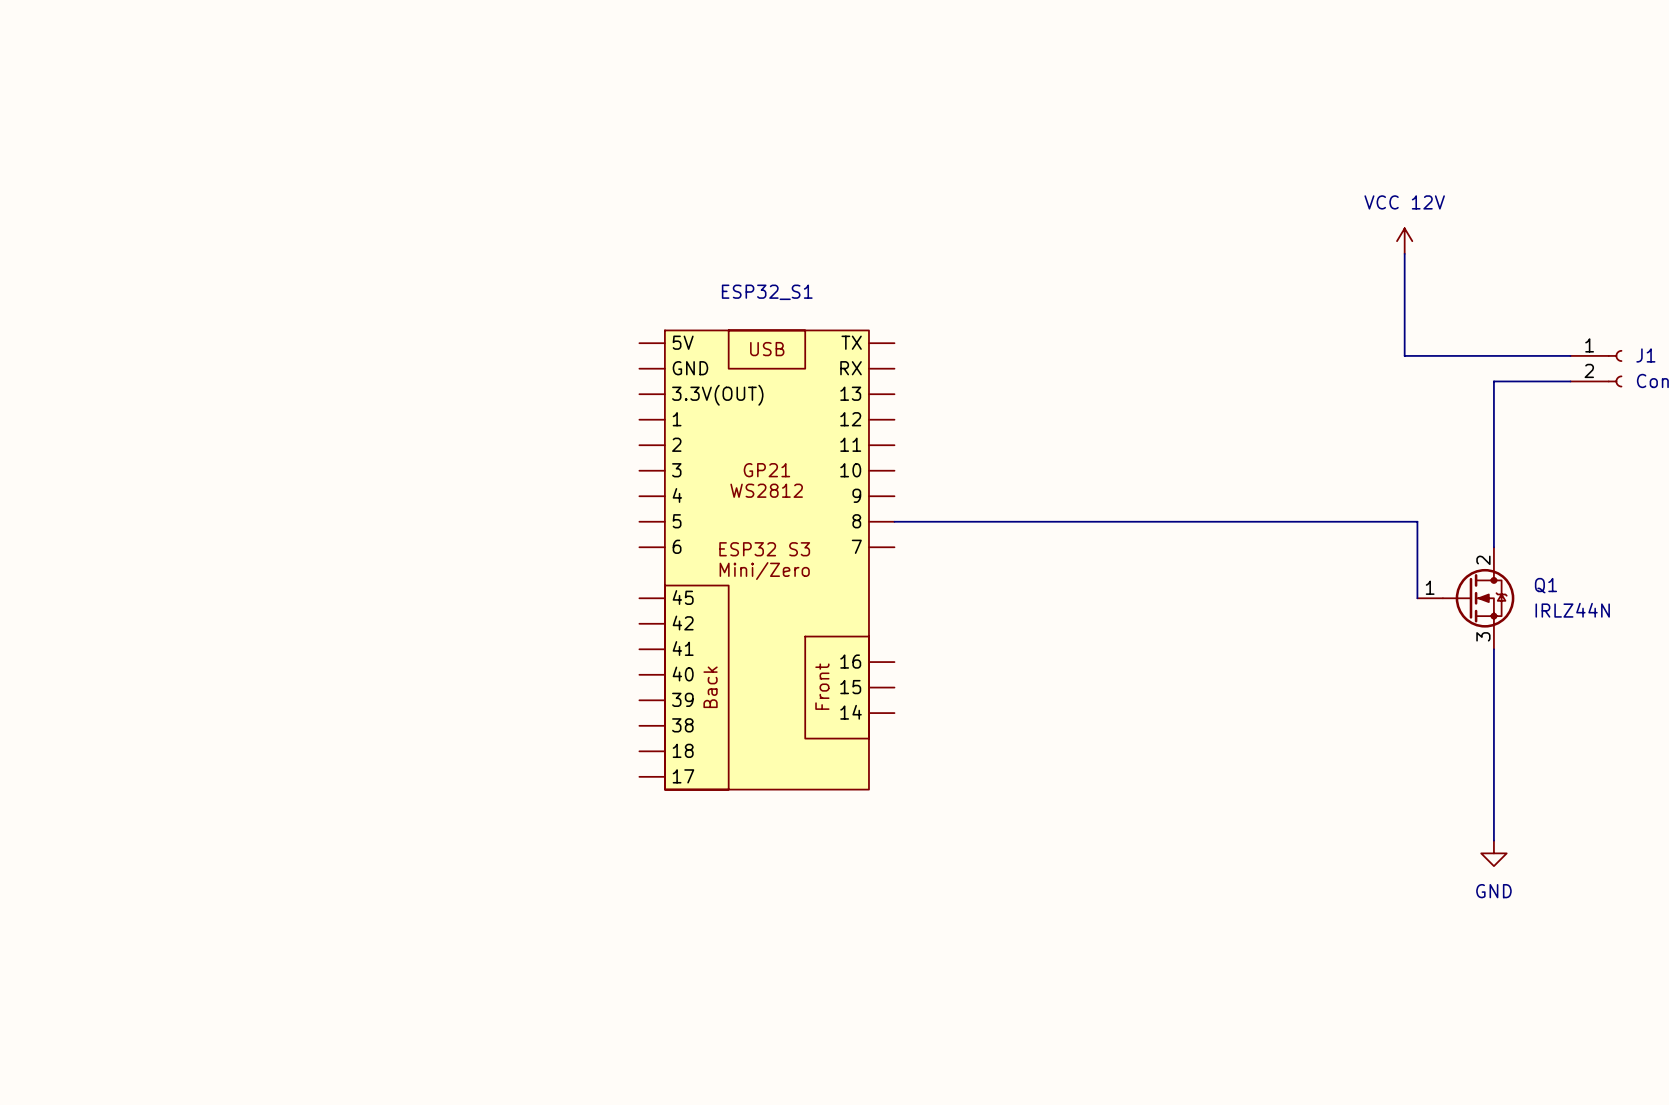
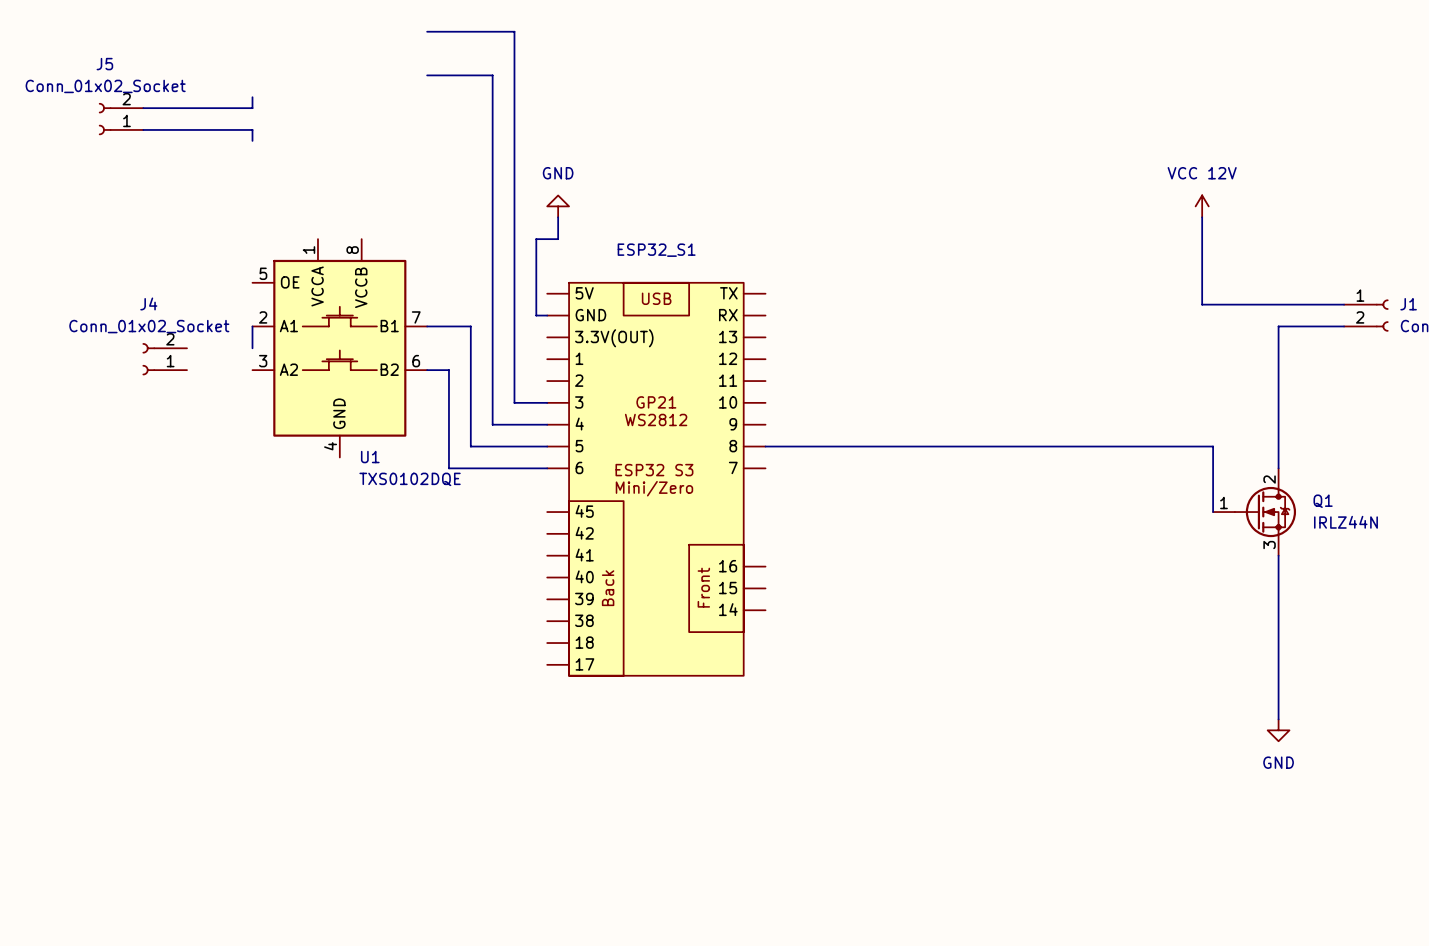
wire: none -> (427, 31) (514, 31) (514, 402) (547, 402)
wire: none -> (427, 75) (492, 75) (492, 424) (547, 424)
wire: none -> (252, 97) (252, 108) (143, 108)
J5: none -> Conn_01x02_Socket (121, 119)
wire: none -> (143, 129) (252, 129) (252, 140)
power symbol: none -> GND (558, 206)
wire: none -> (558, 217) (558, 239) (536, 239) (536, 315) (547, 315)
wire: none -> (252, 326) (252, 348)
wire: none -> (427, 326) (470, 326) (470, 446) (547, 446)
U1: none -> TXS0102DQE (339, 348)
J4: none -> Conn_01x02_Socket (164, 359)
wire: none -> (427, 370) (448, 370) (448, 468) (547, 468)

